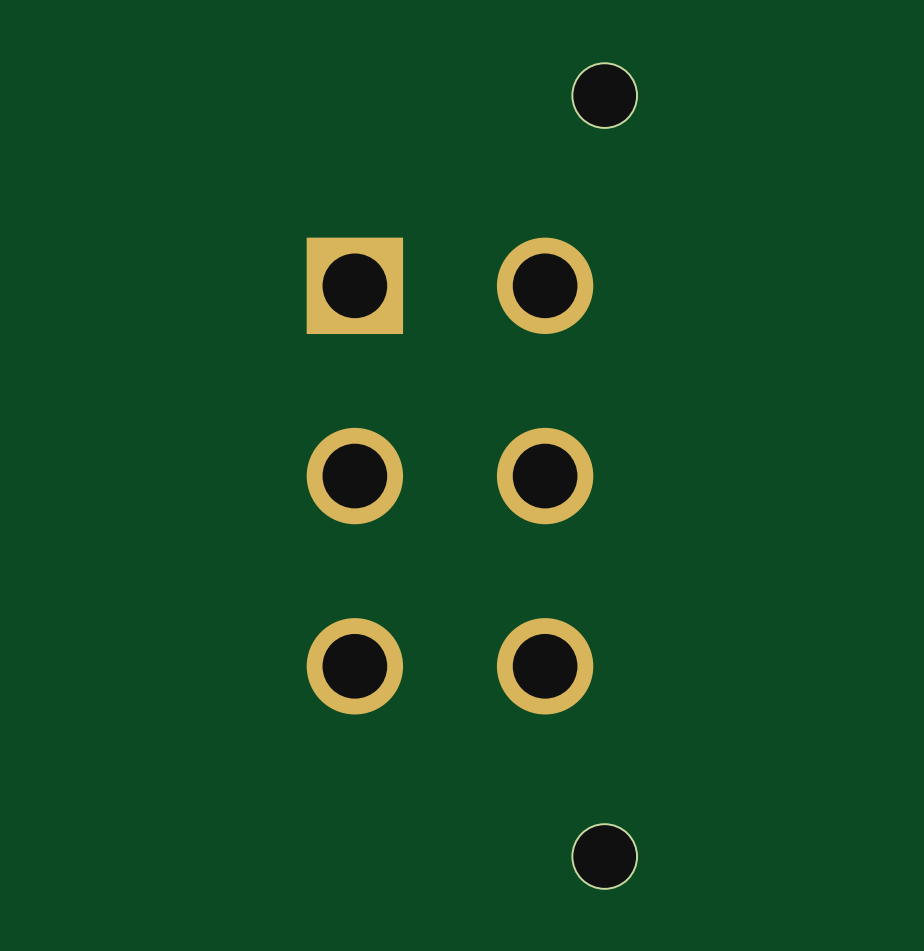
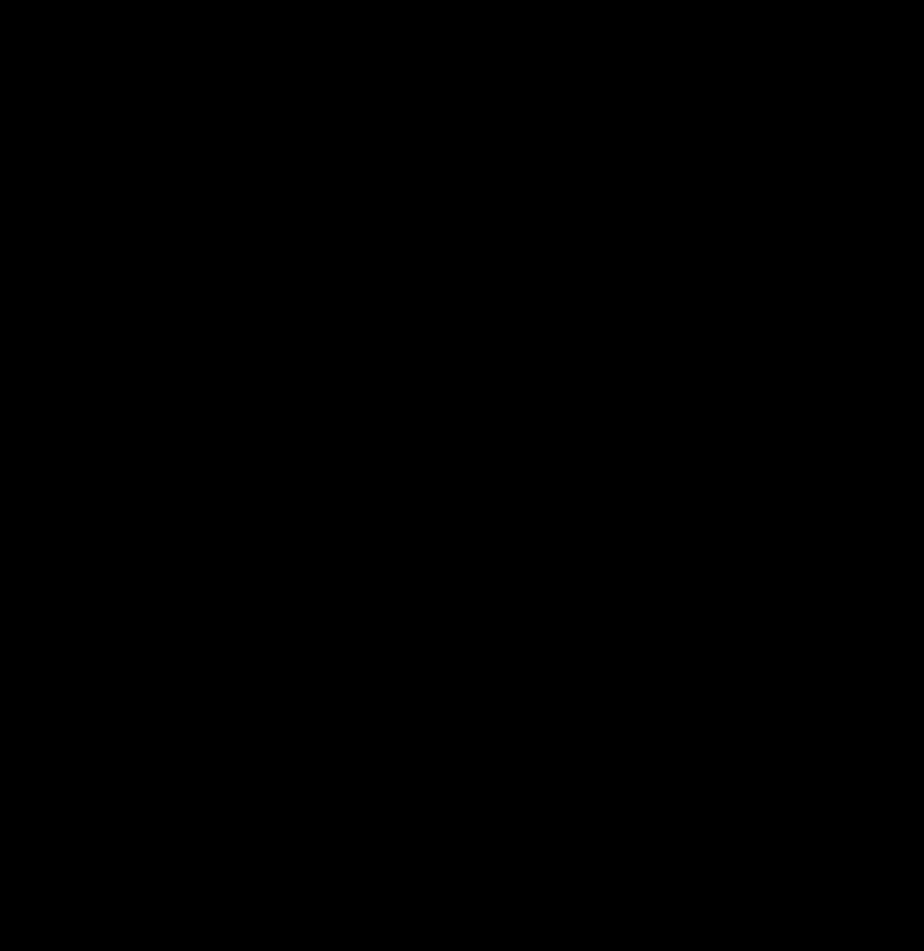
part: (471, 476) -> none

